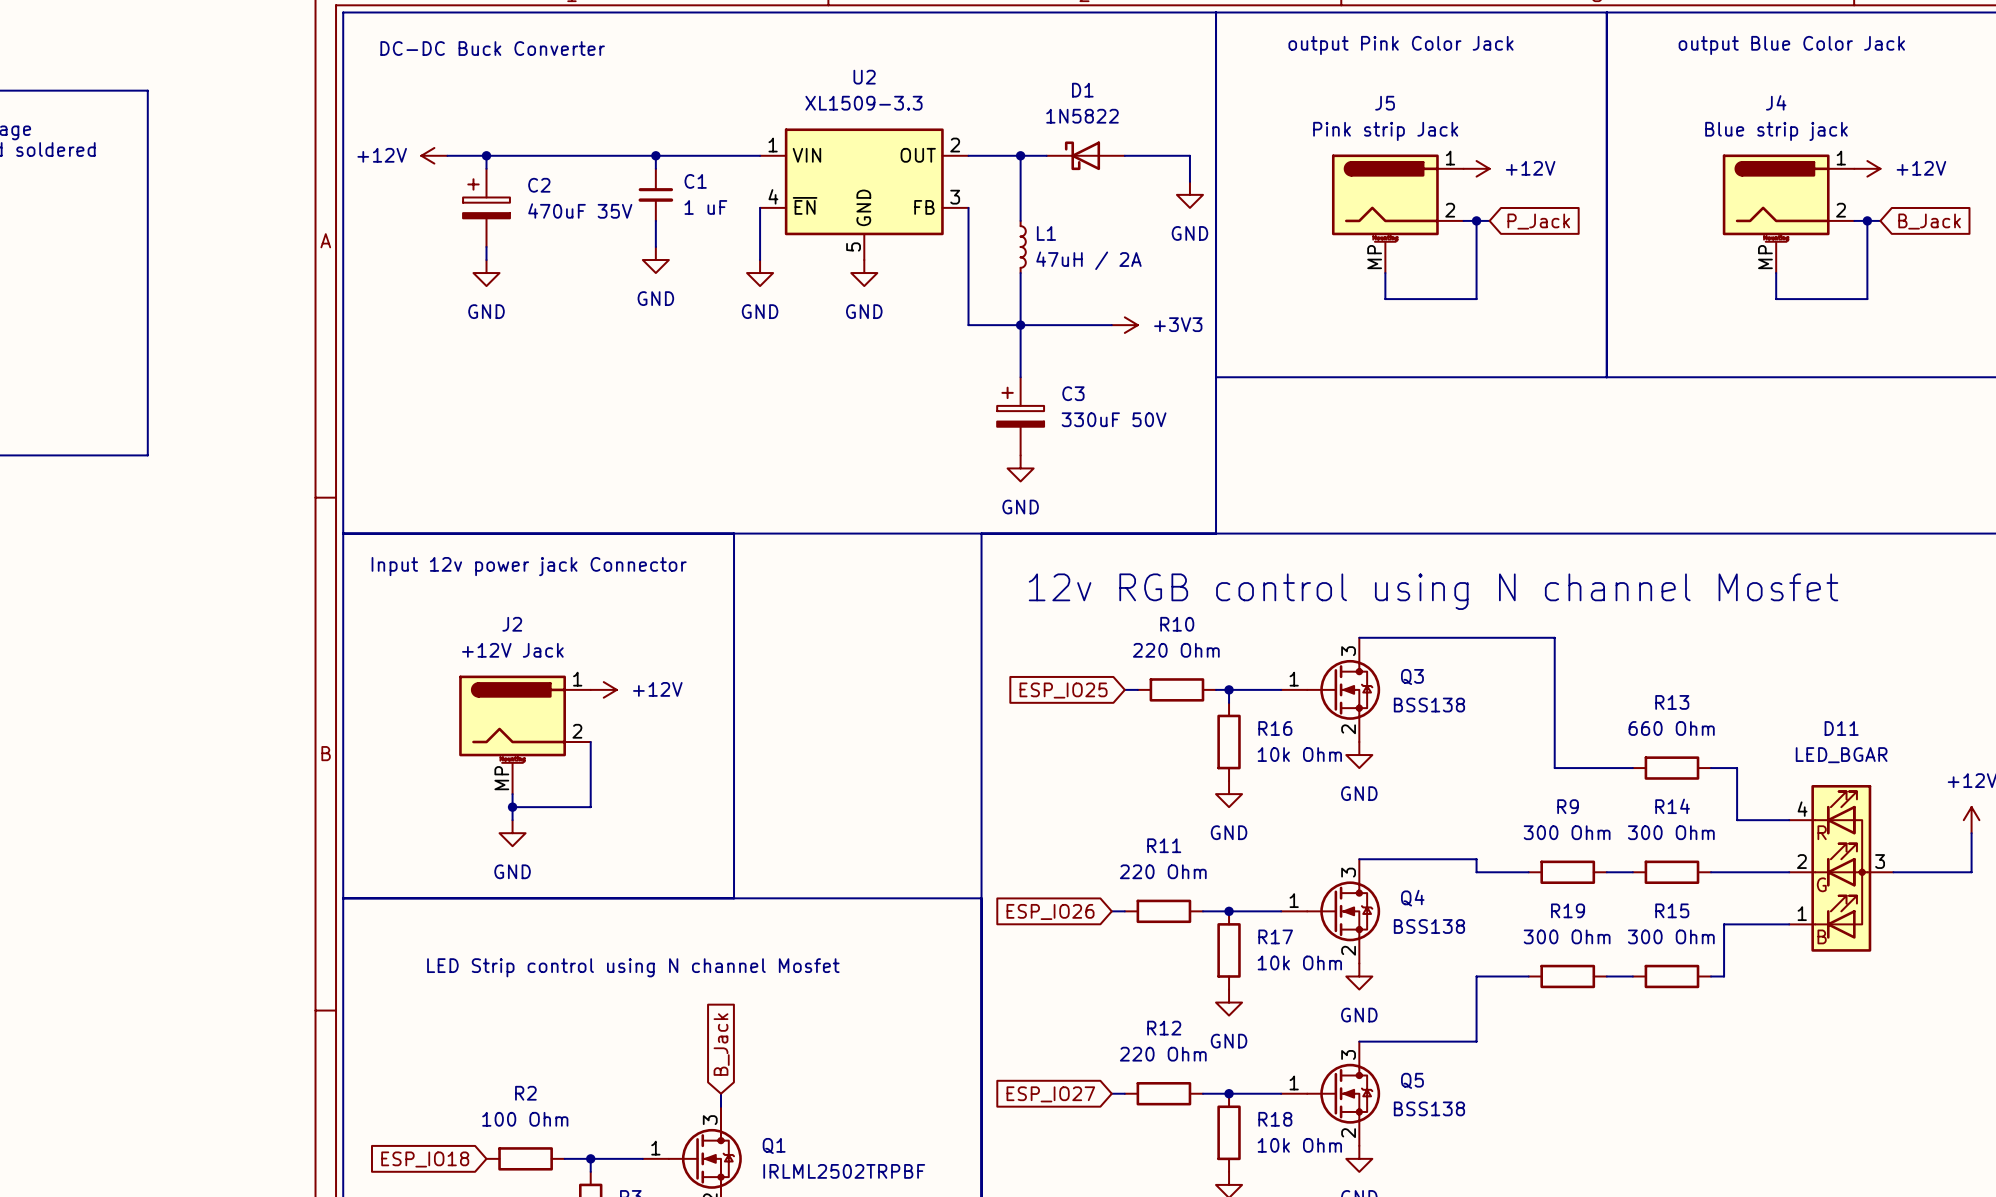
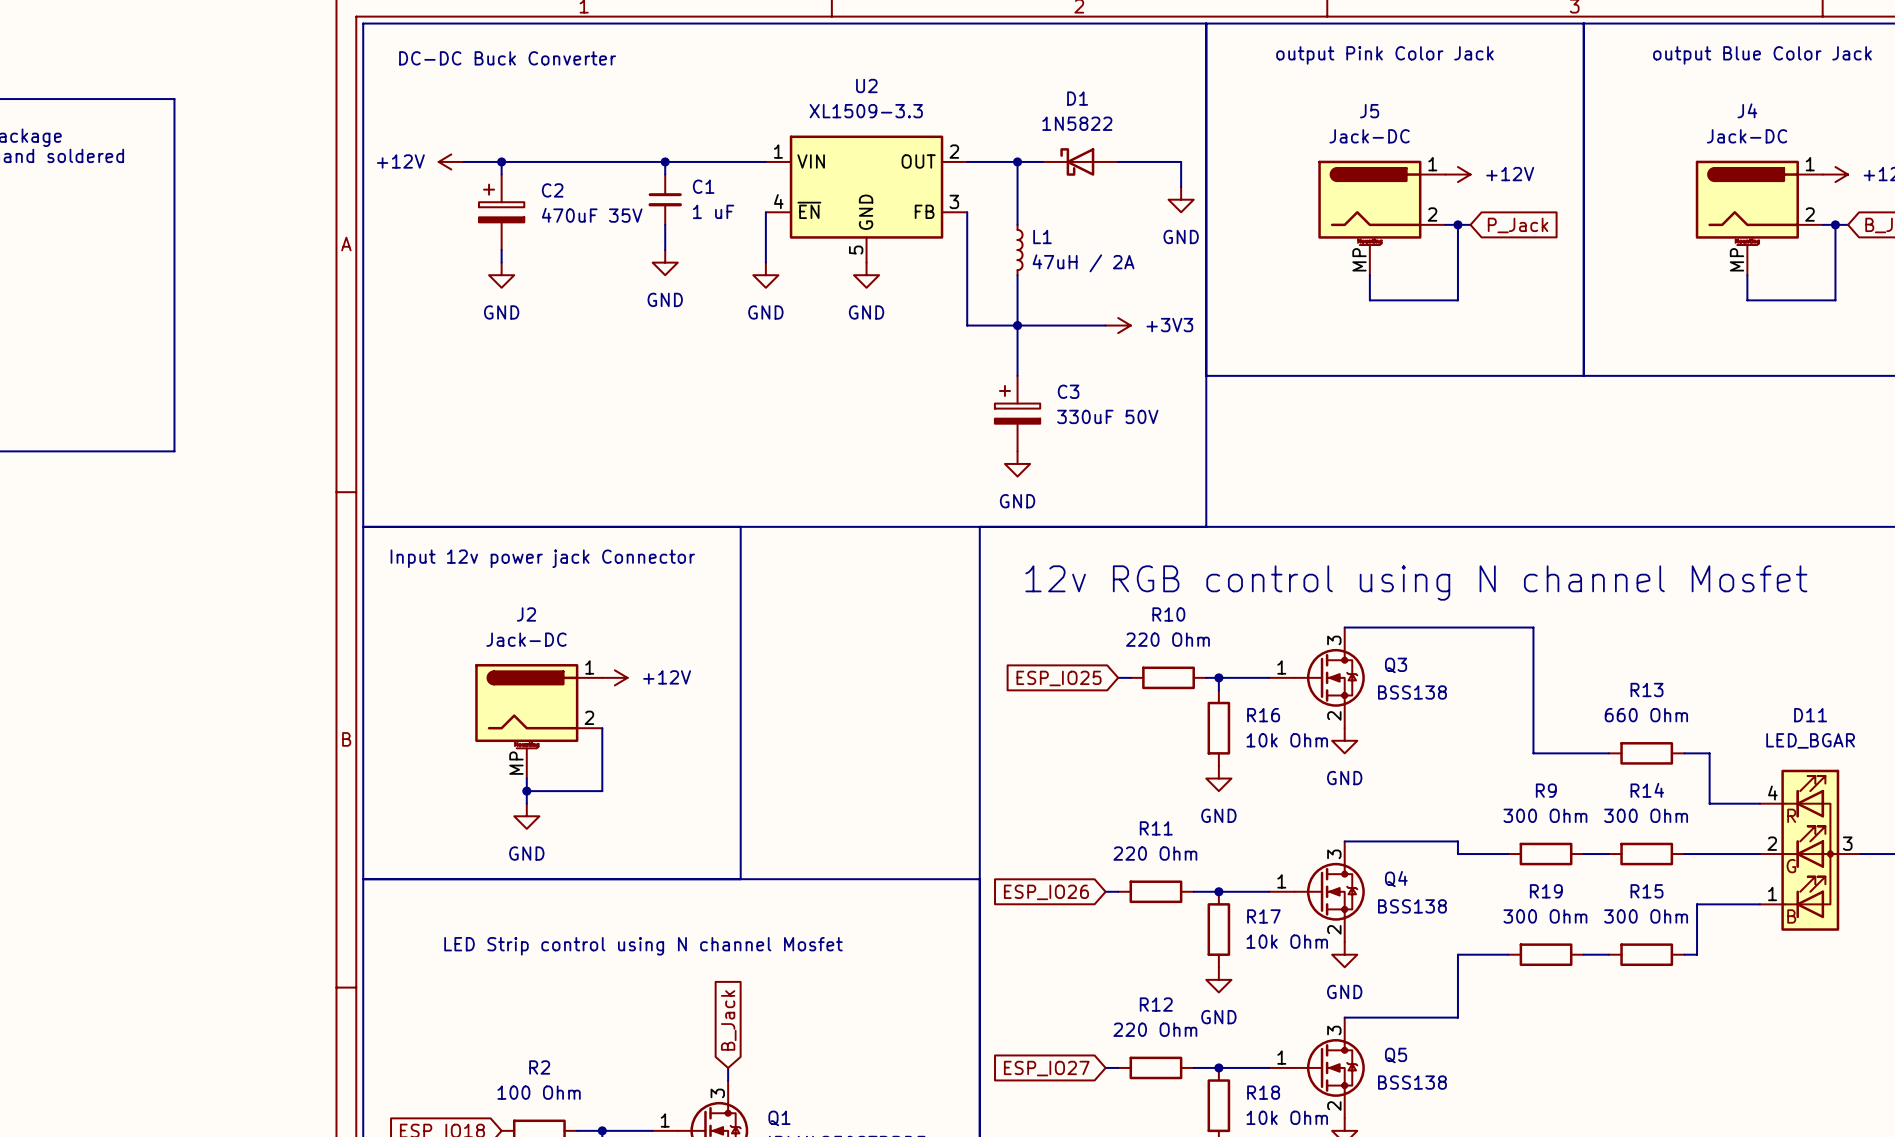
J5 value: Pink strip Jack (1385, 131) -> Jack-DC (1369, 136)
J4 value: Blue strip jack (1776, 131) -> Jack-DC (1747, 136)
J2 value: +12V Jack (512, 650) -> Jack-DC (526, 639)

